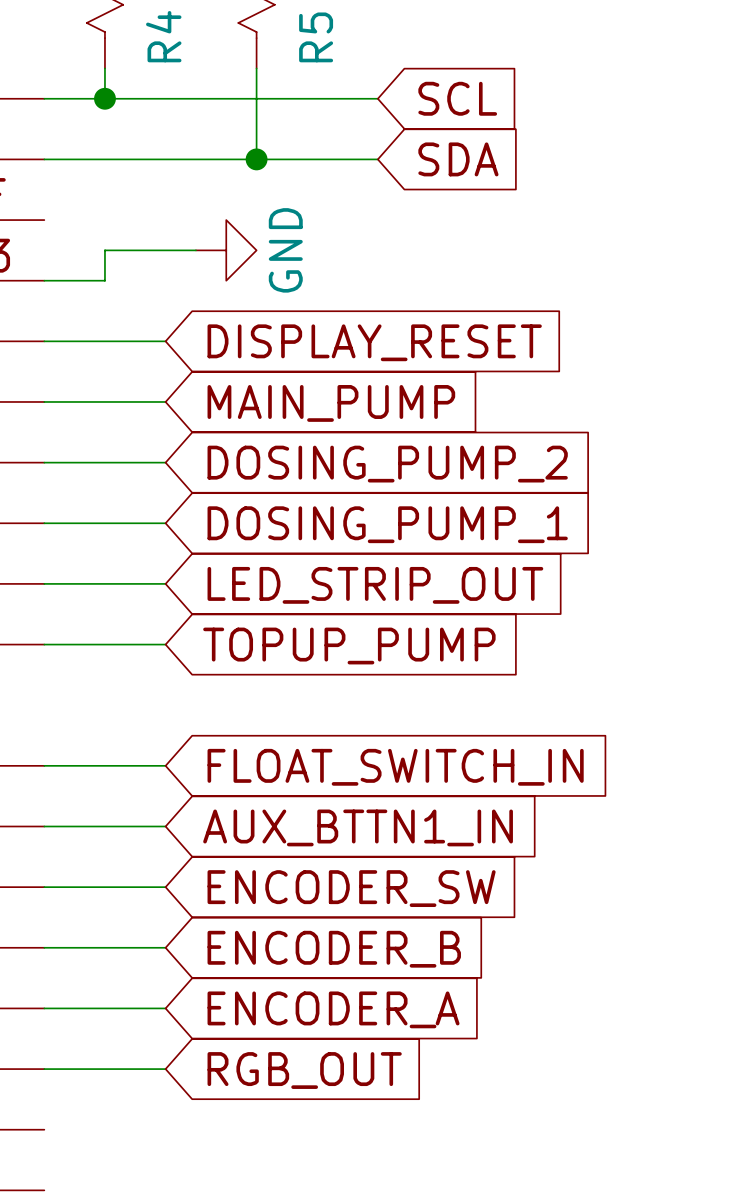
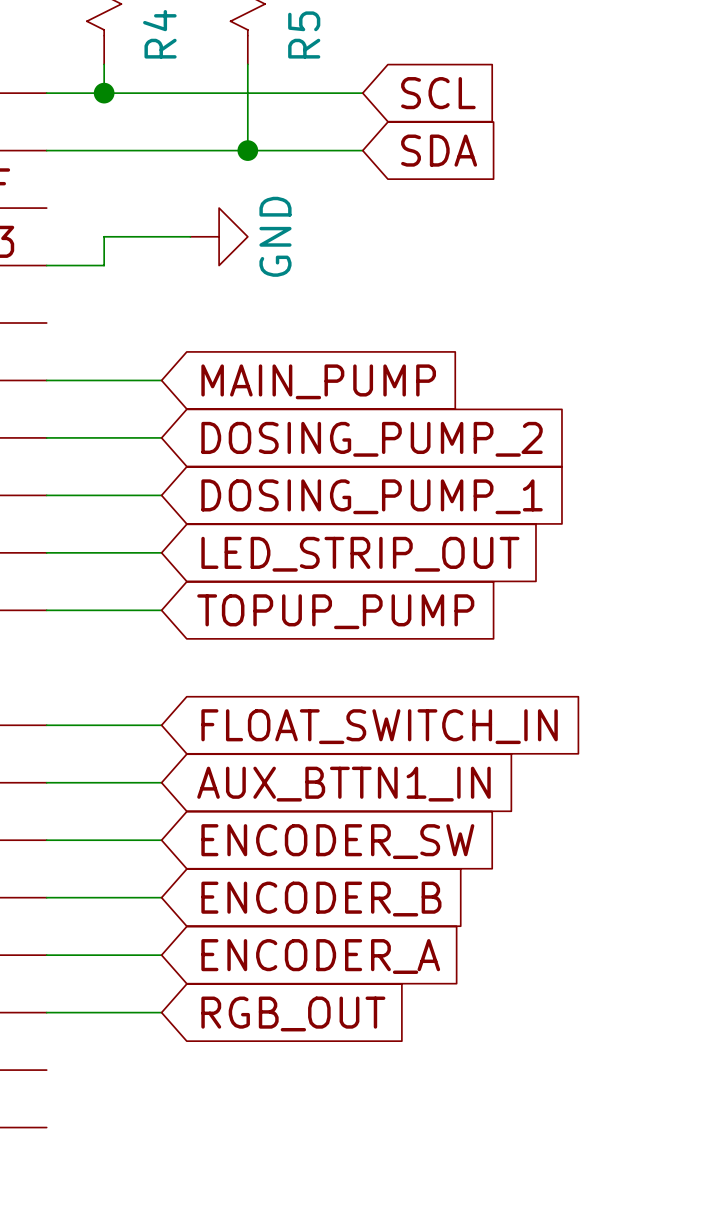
wire: (44, 341) (165, 341) -> none
global label: DISPLAY_RESET (374, 342) -> none

